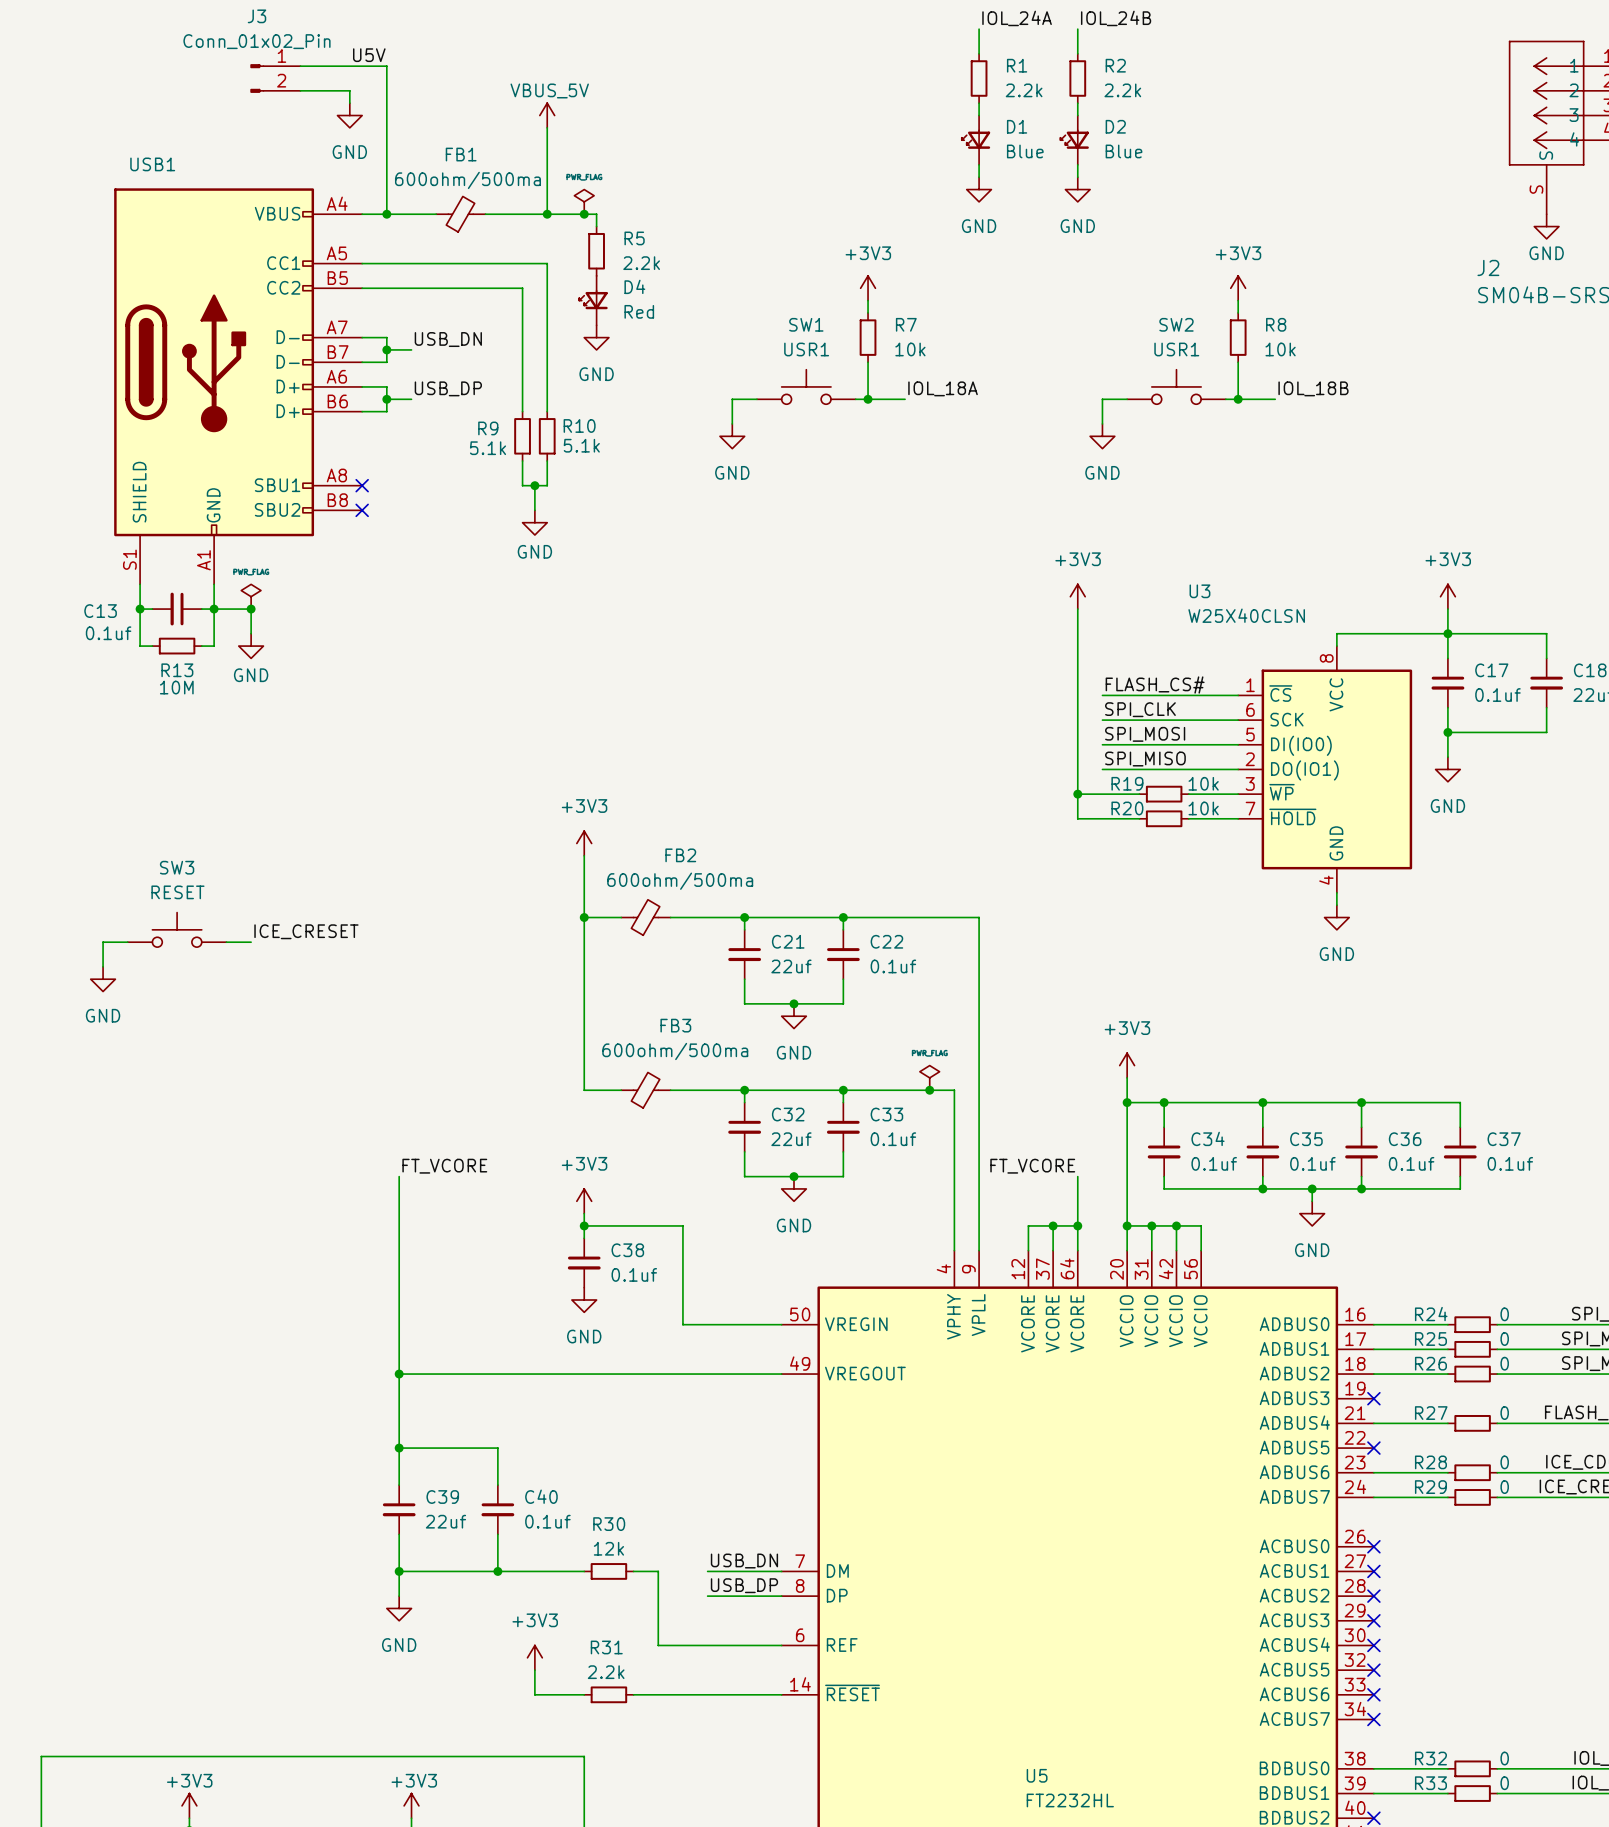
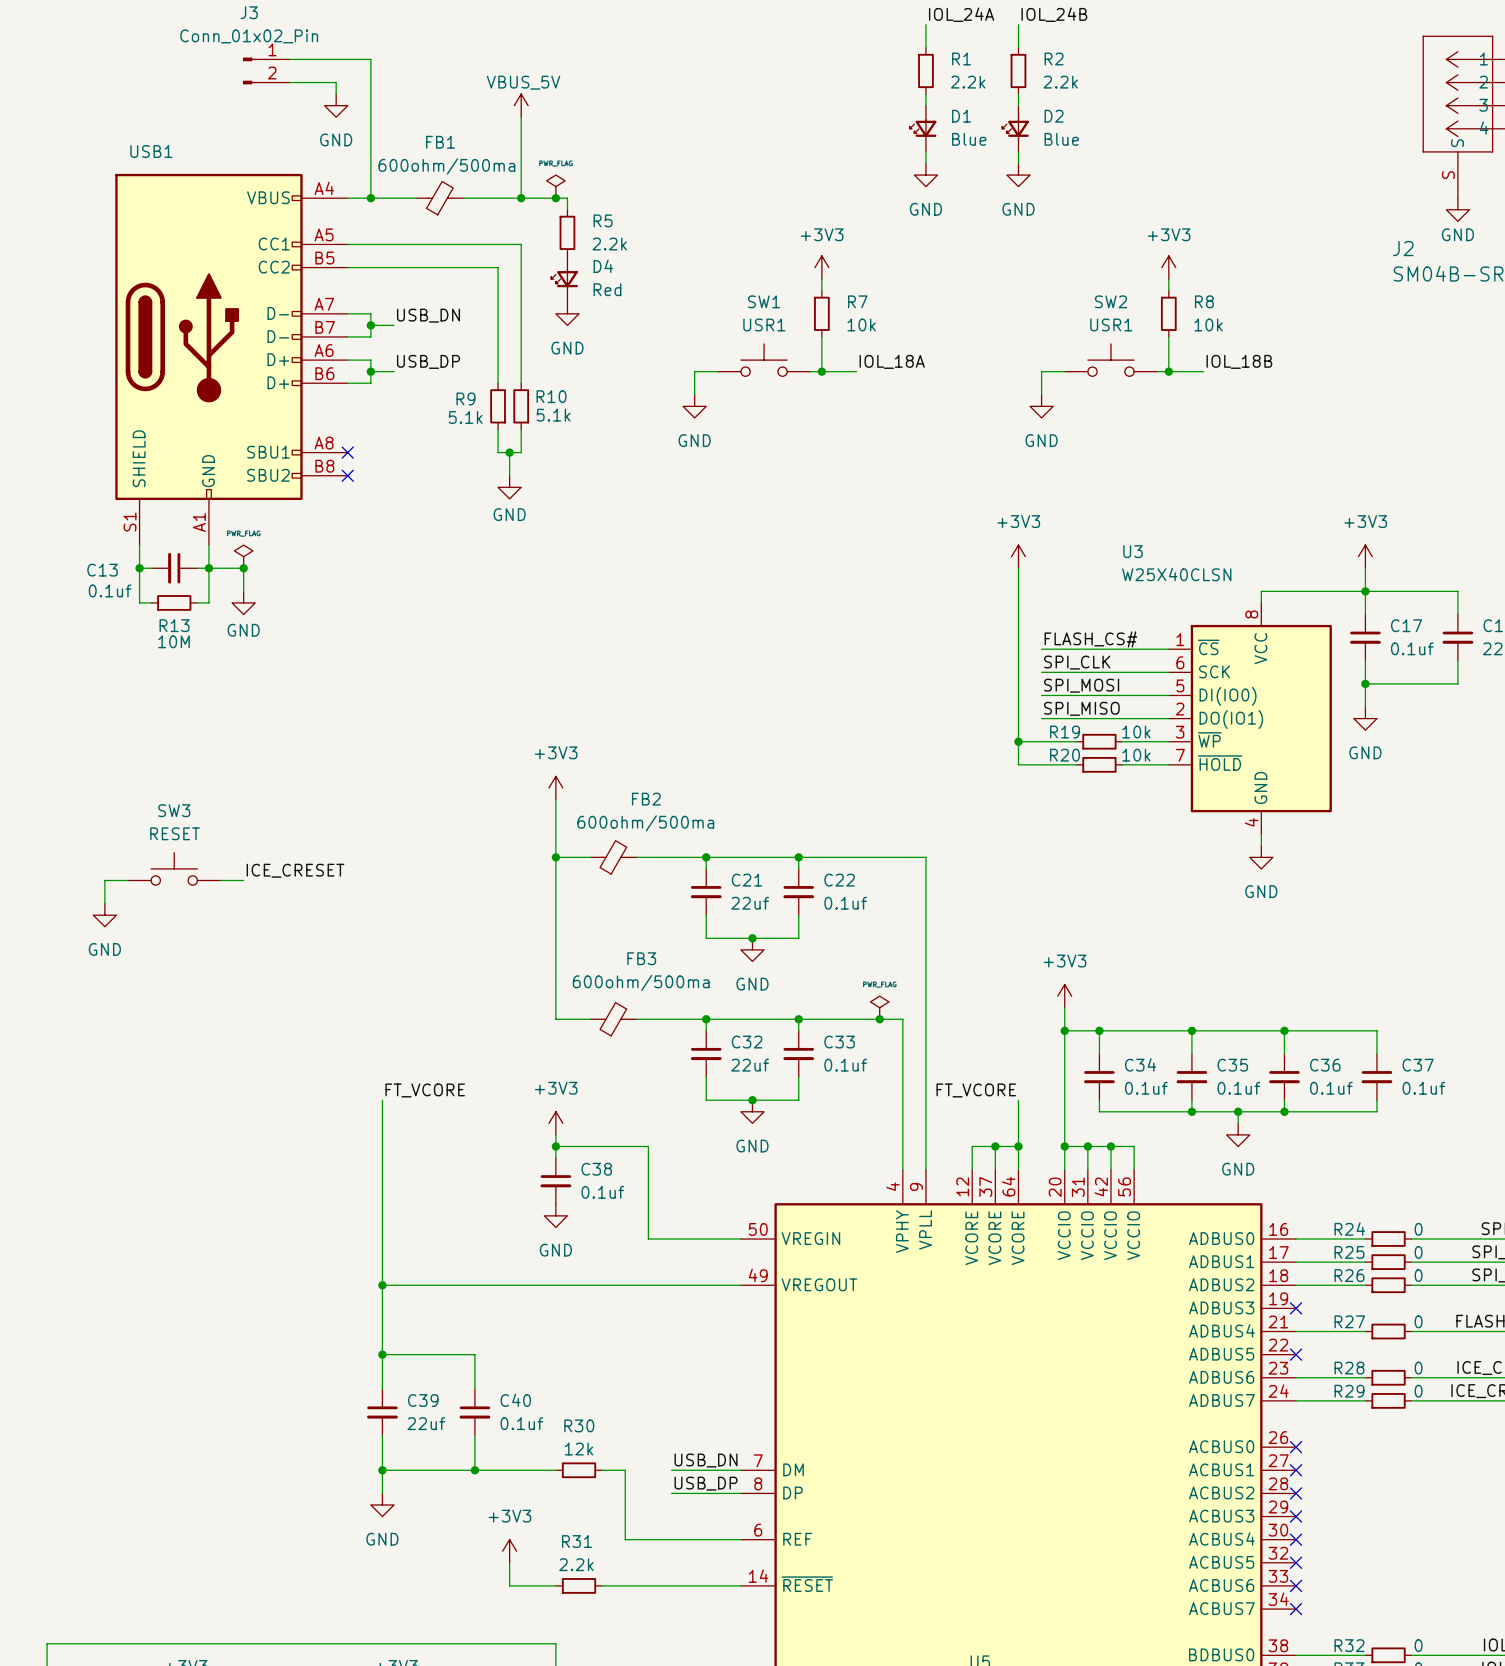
label: U5V (369, 55) -> none

